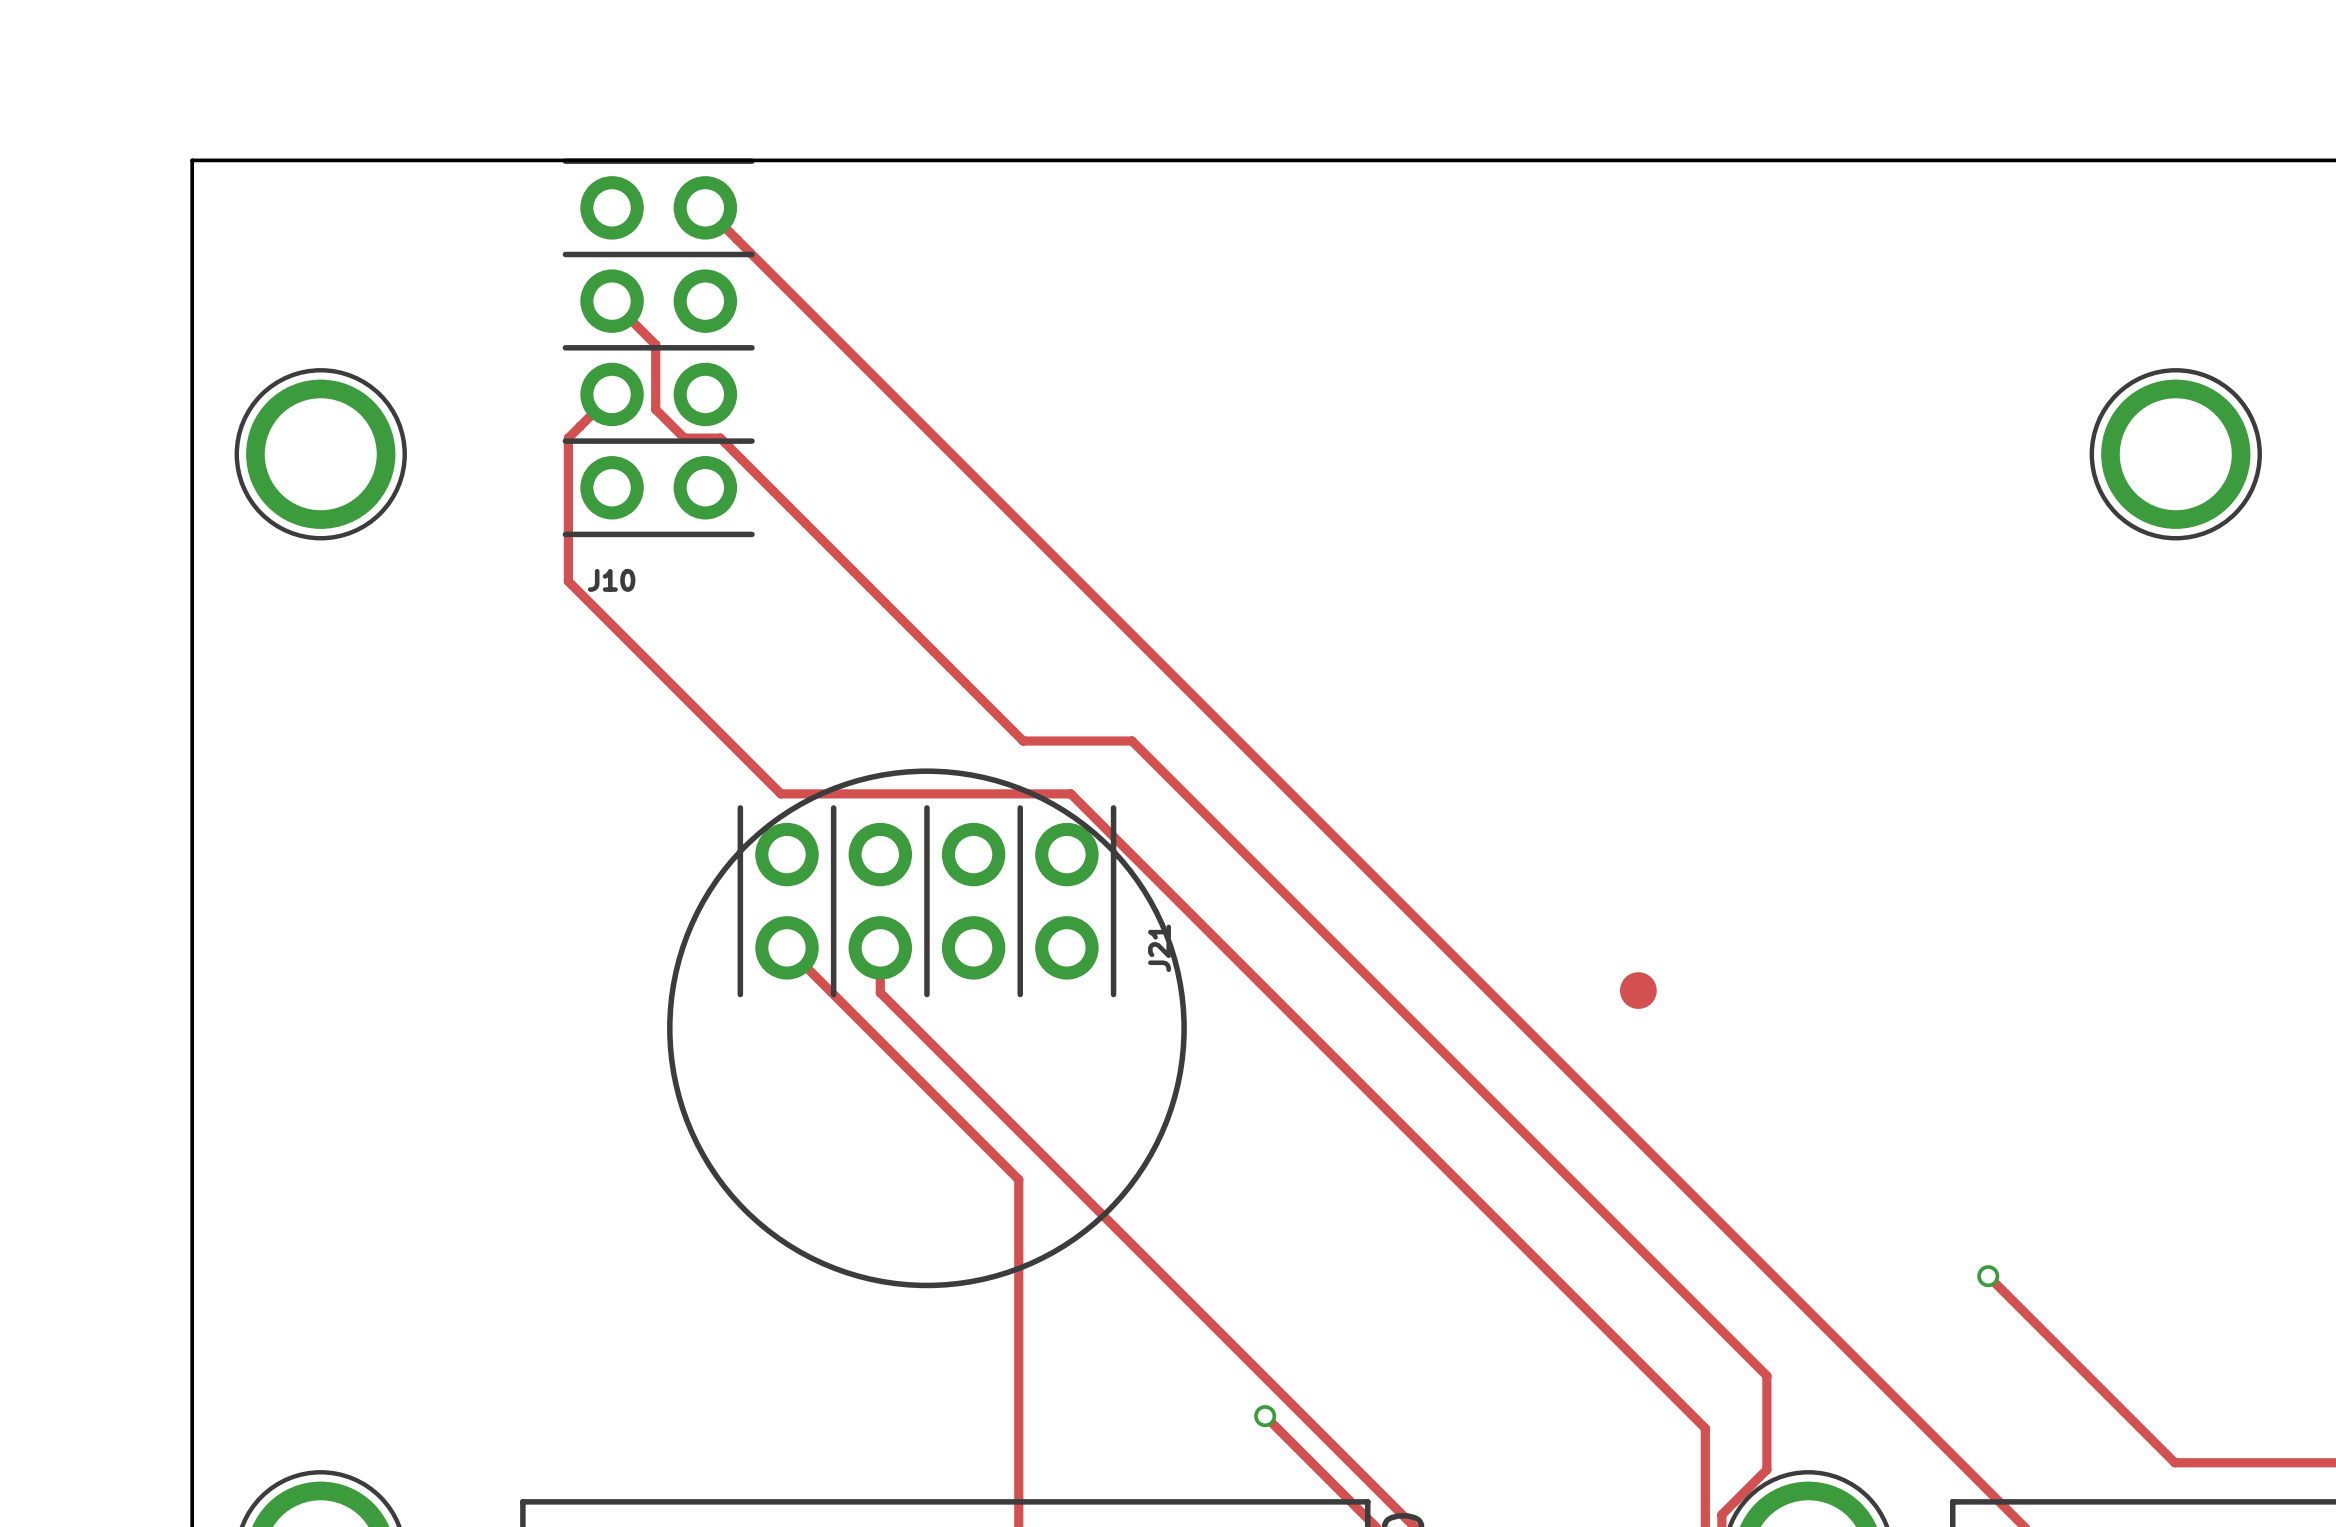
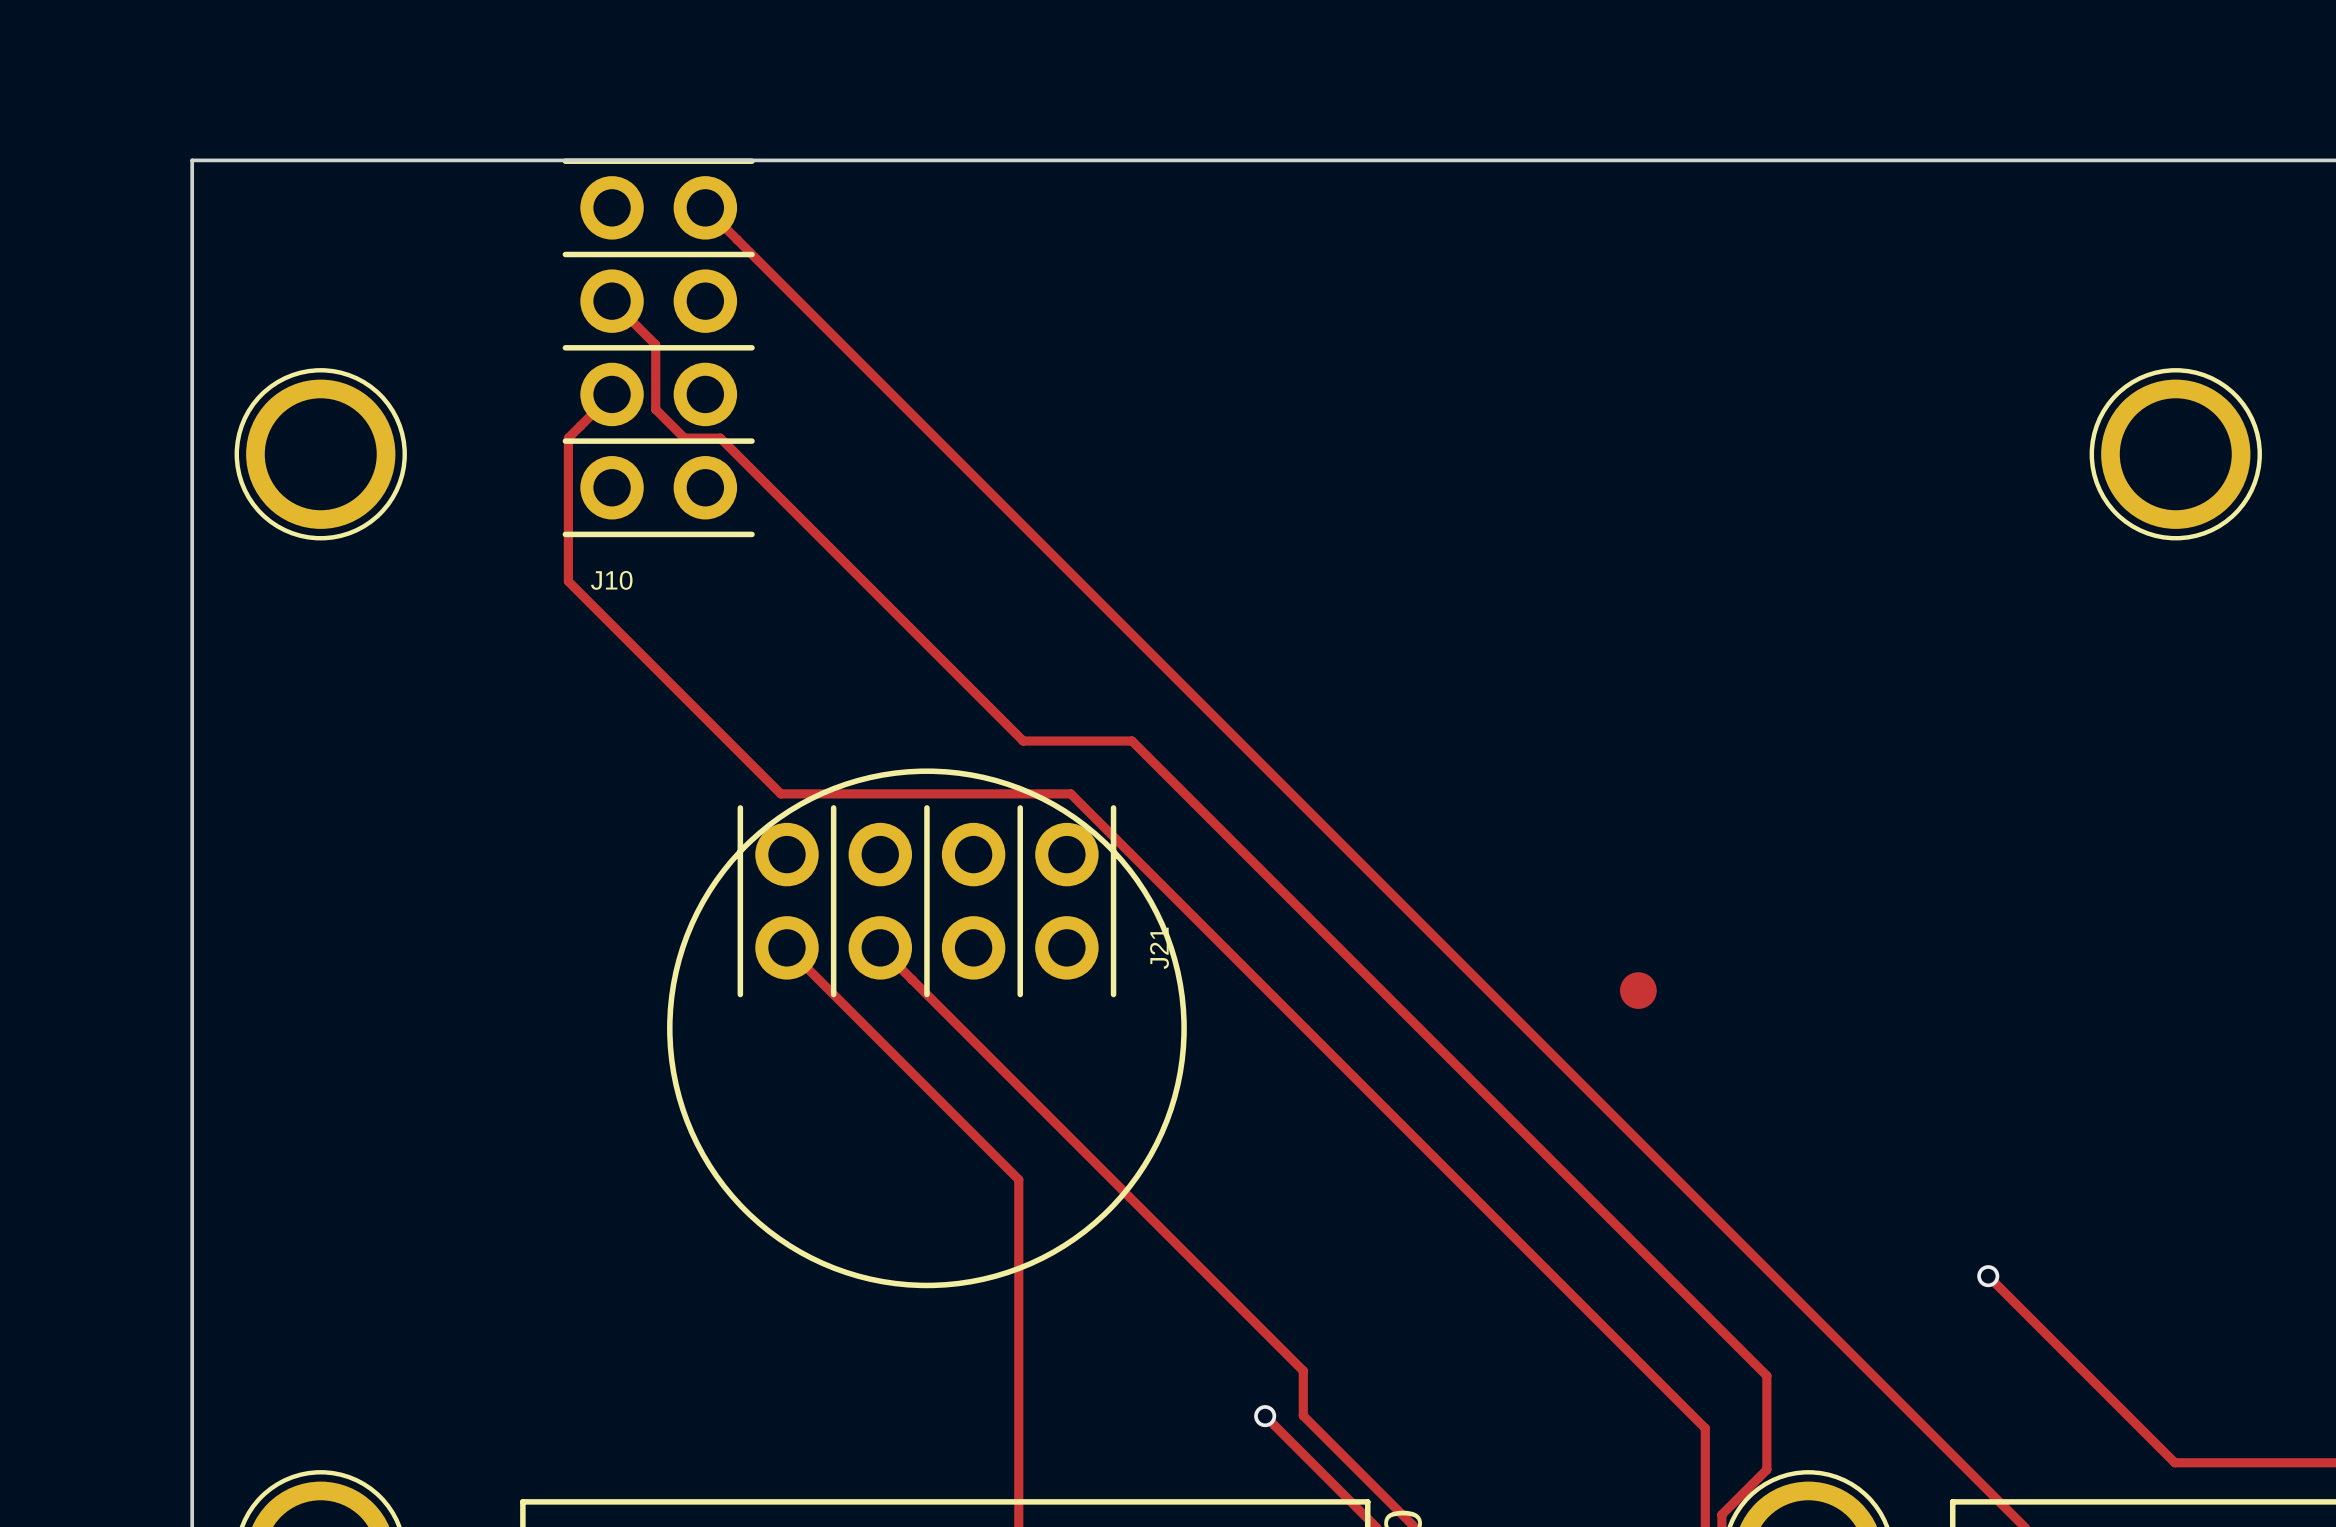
track: (880, 947) (880, 992) (1303, 1415) -> (880, 947) (1303, 1370) (1303, 1415)

